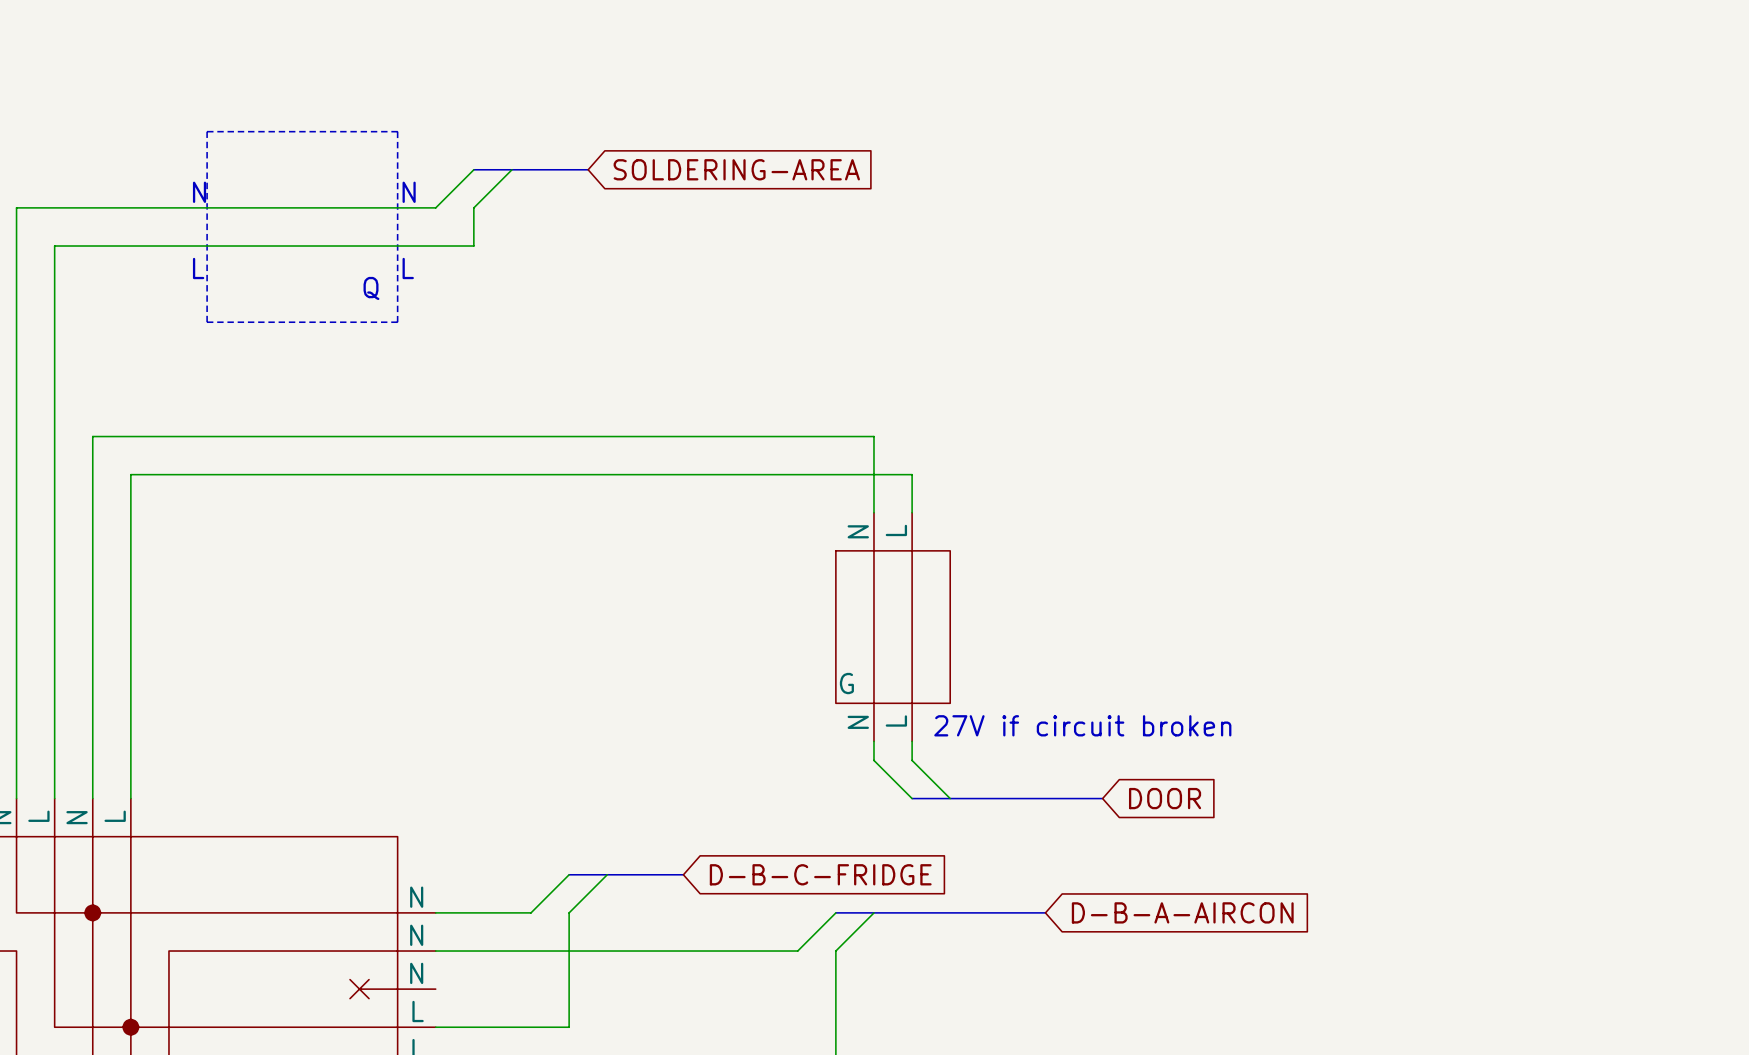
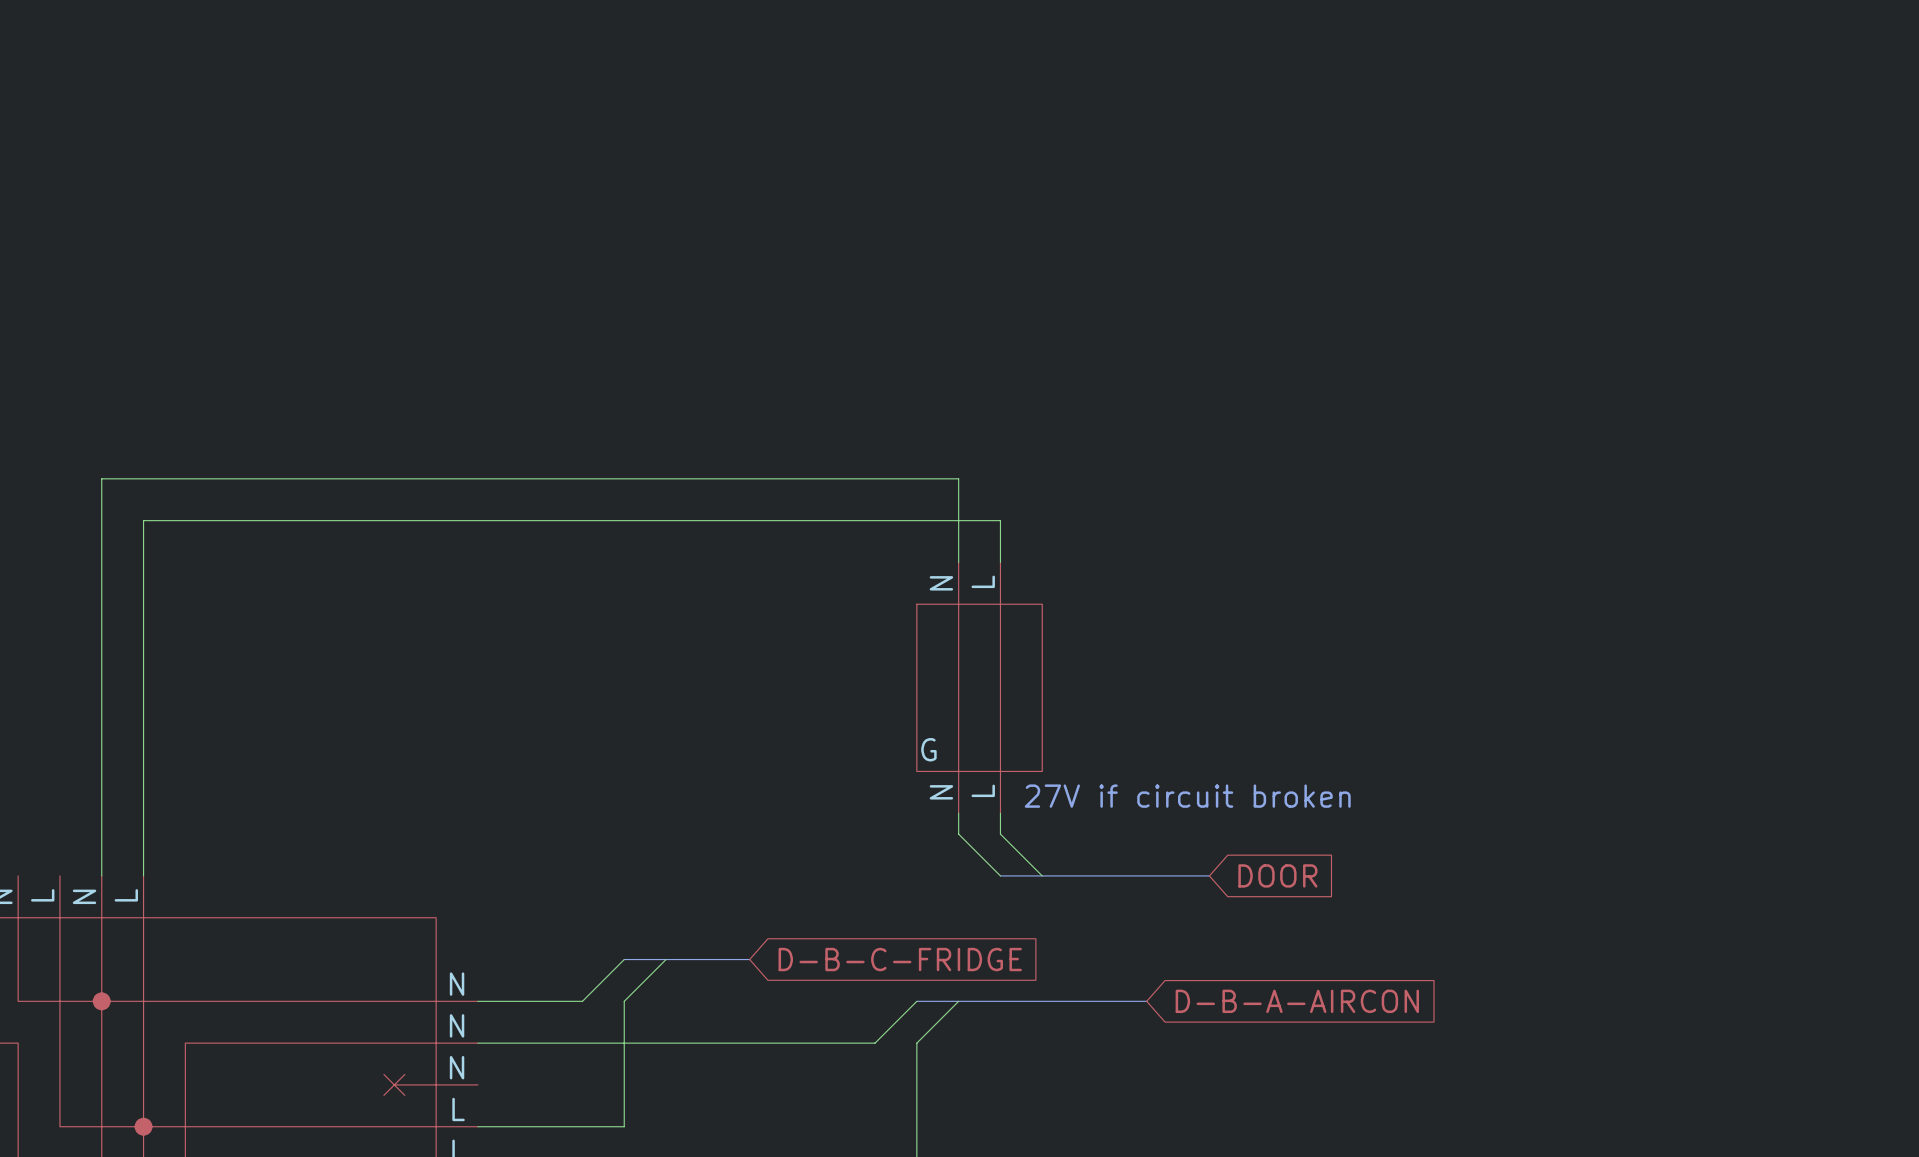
line: (207, 131) (397, 131) (397, 322) (207, 322) (207, 131) -> none
wire: (473, 169) (435, 207) (16, 207) (16, 798) -> none
bus: (473, 169) (588, 169) -> none
wire: (511, 169) (473, 207) (473, 246) (54, 246) (54, 798) -> none
global label: SOLDERING-AREA (736, 169) -> none
text: N (199, 192) -> none
text: N (409, 192) -> none
text: L (198, 268) -> none
text: L (408, 268) -> none
text: Q (371, 288) -> none

